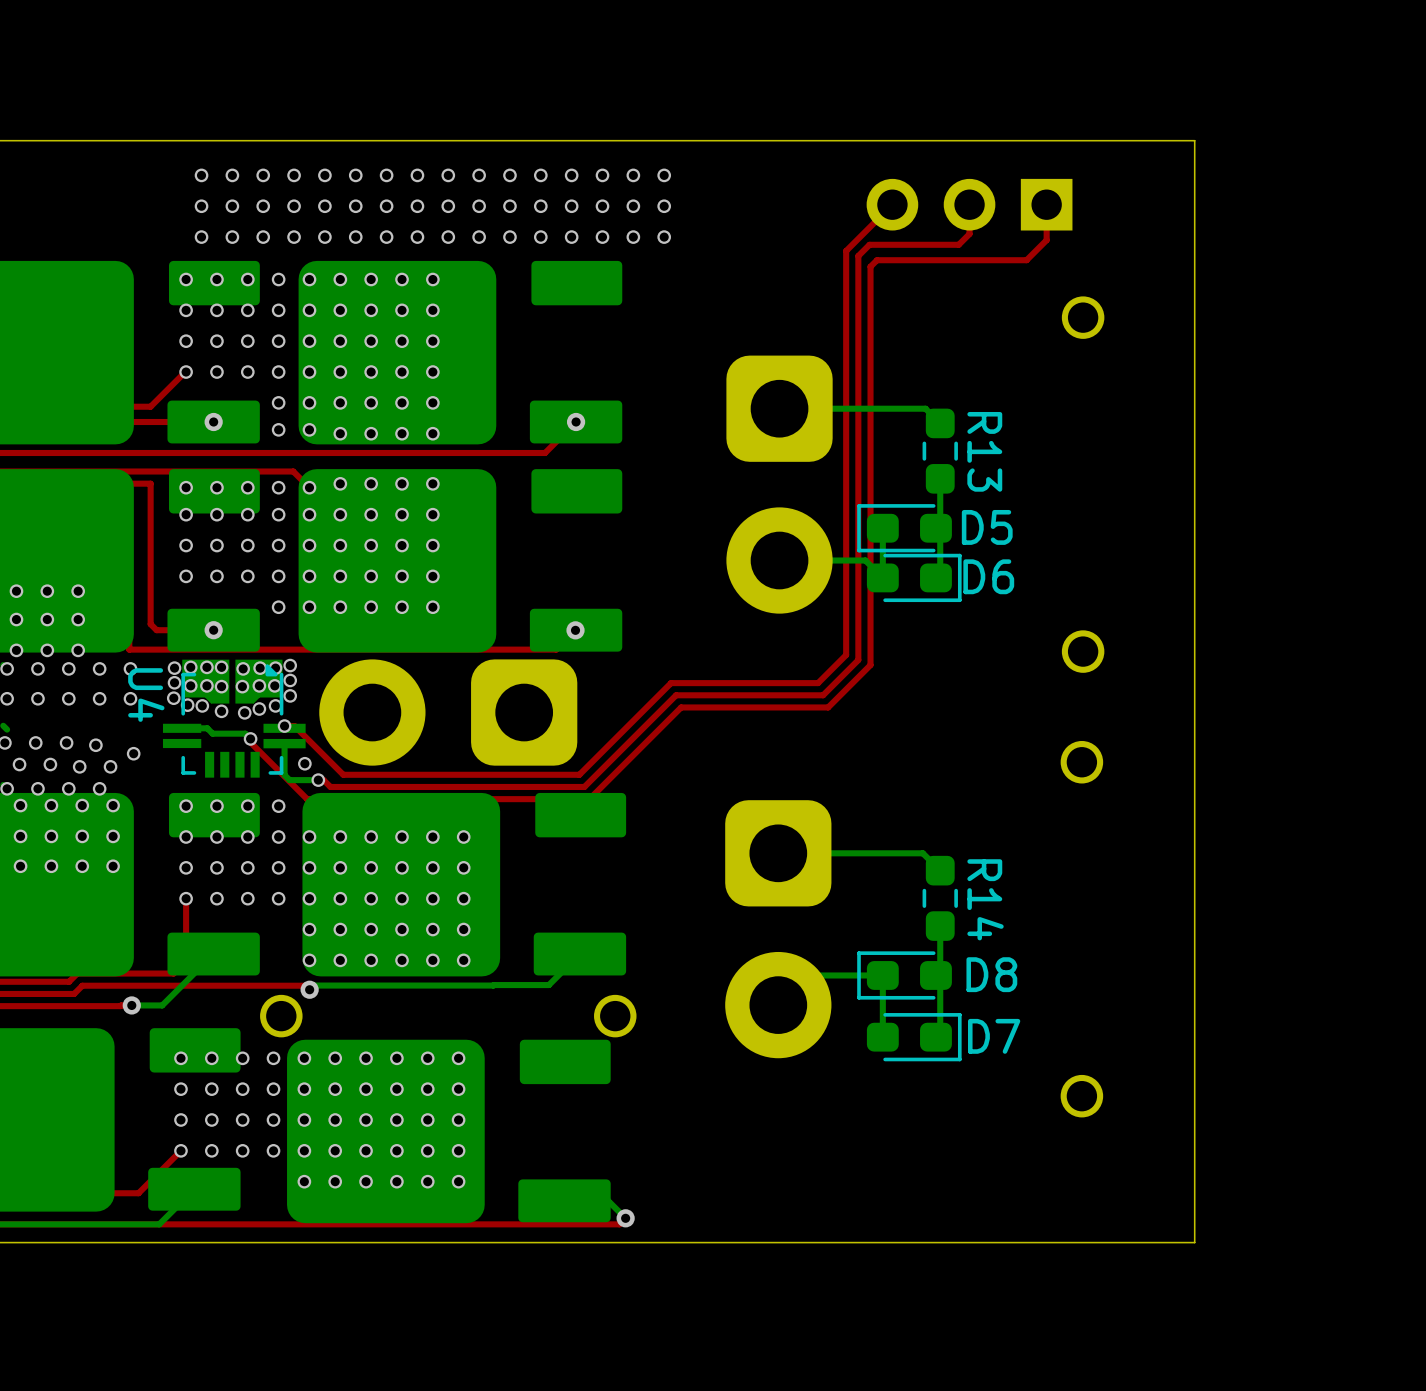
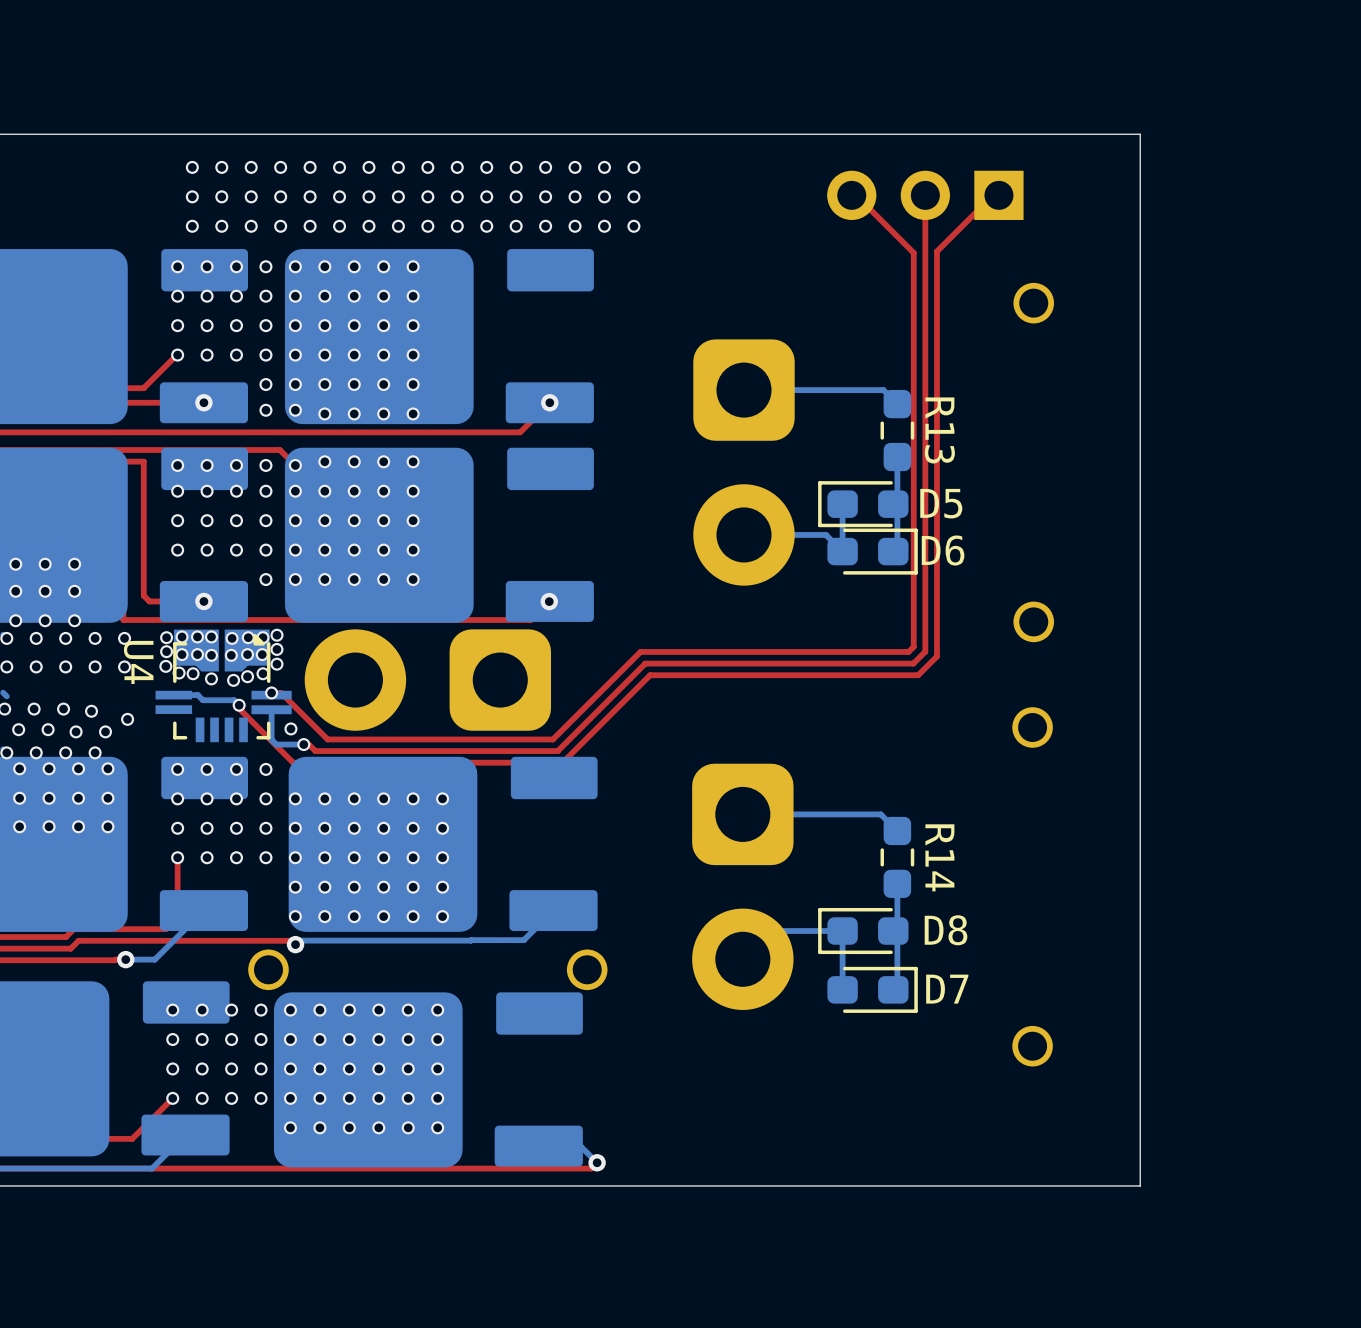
top track: (892, 204) (846, 250) (846, 655) (818, 683) -> (851, 195) (856, 195) (913, 252) (913, 646) (908, 651) (780, 651)
top track: (1046, 204) (1046, 240) (1026, 260) (877, 260) (870, 266) (870, 665) (828, 707) -> (998, 195) (993, 195) (936, 251) (936, 656) (918, 675) (790, 675)
top track: (969, 234) (958, 244) (869, 244) (858, 256) (858, 660) (823, 695) -> (925, 223) (925, 651) (913, 663) (785, 663)

